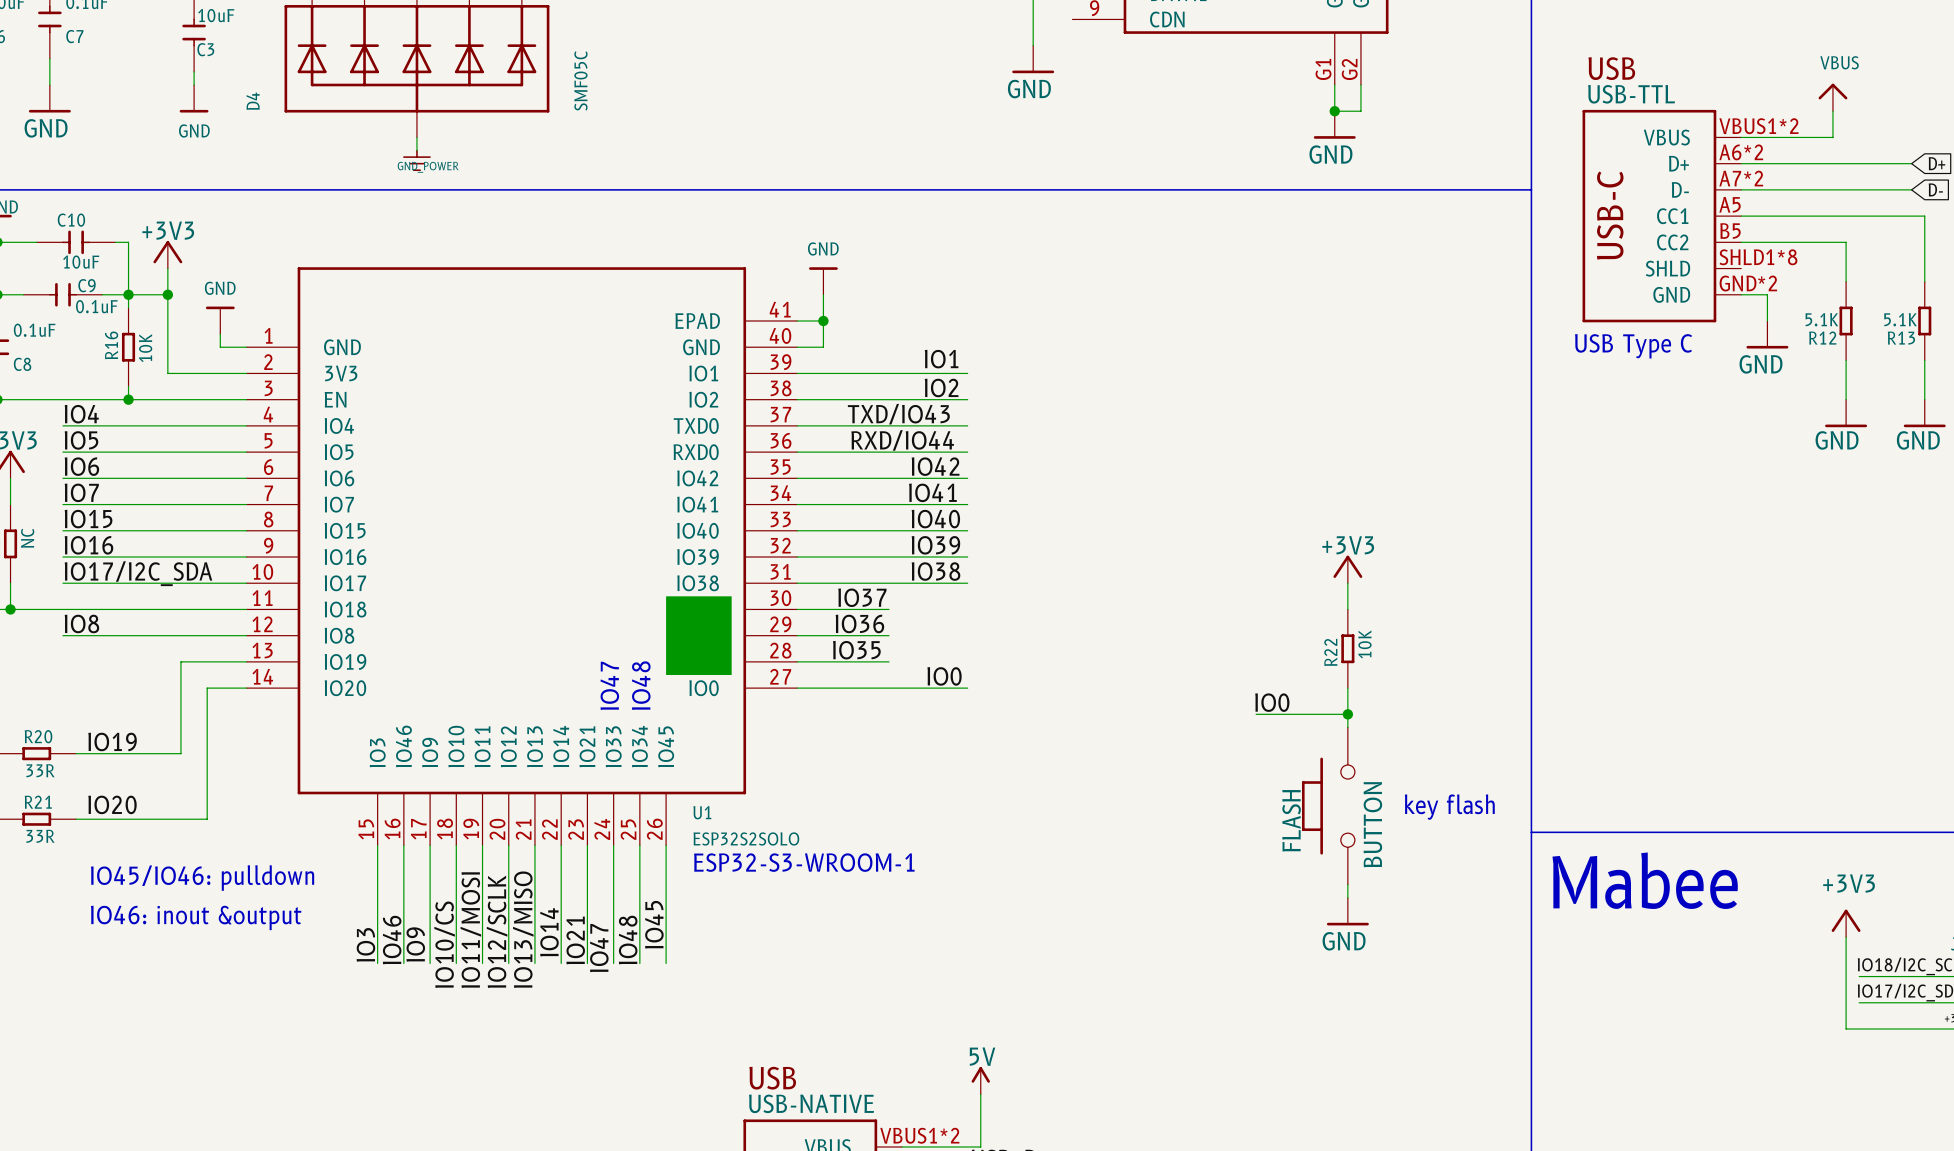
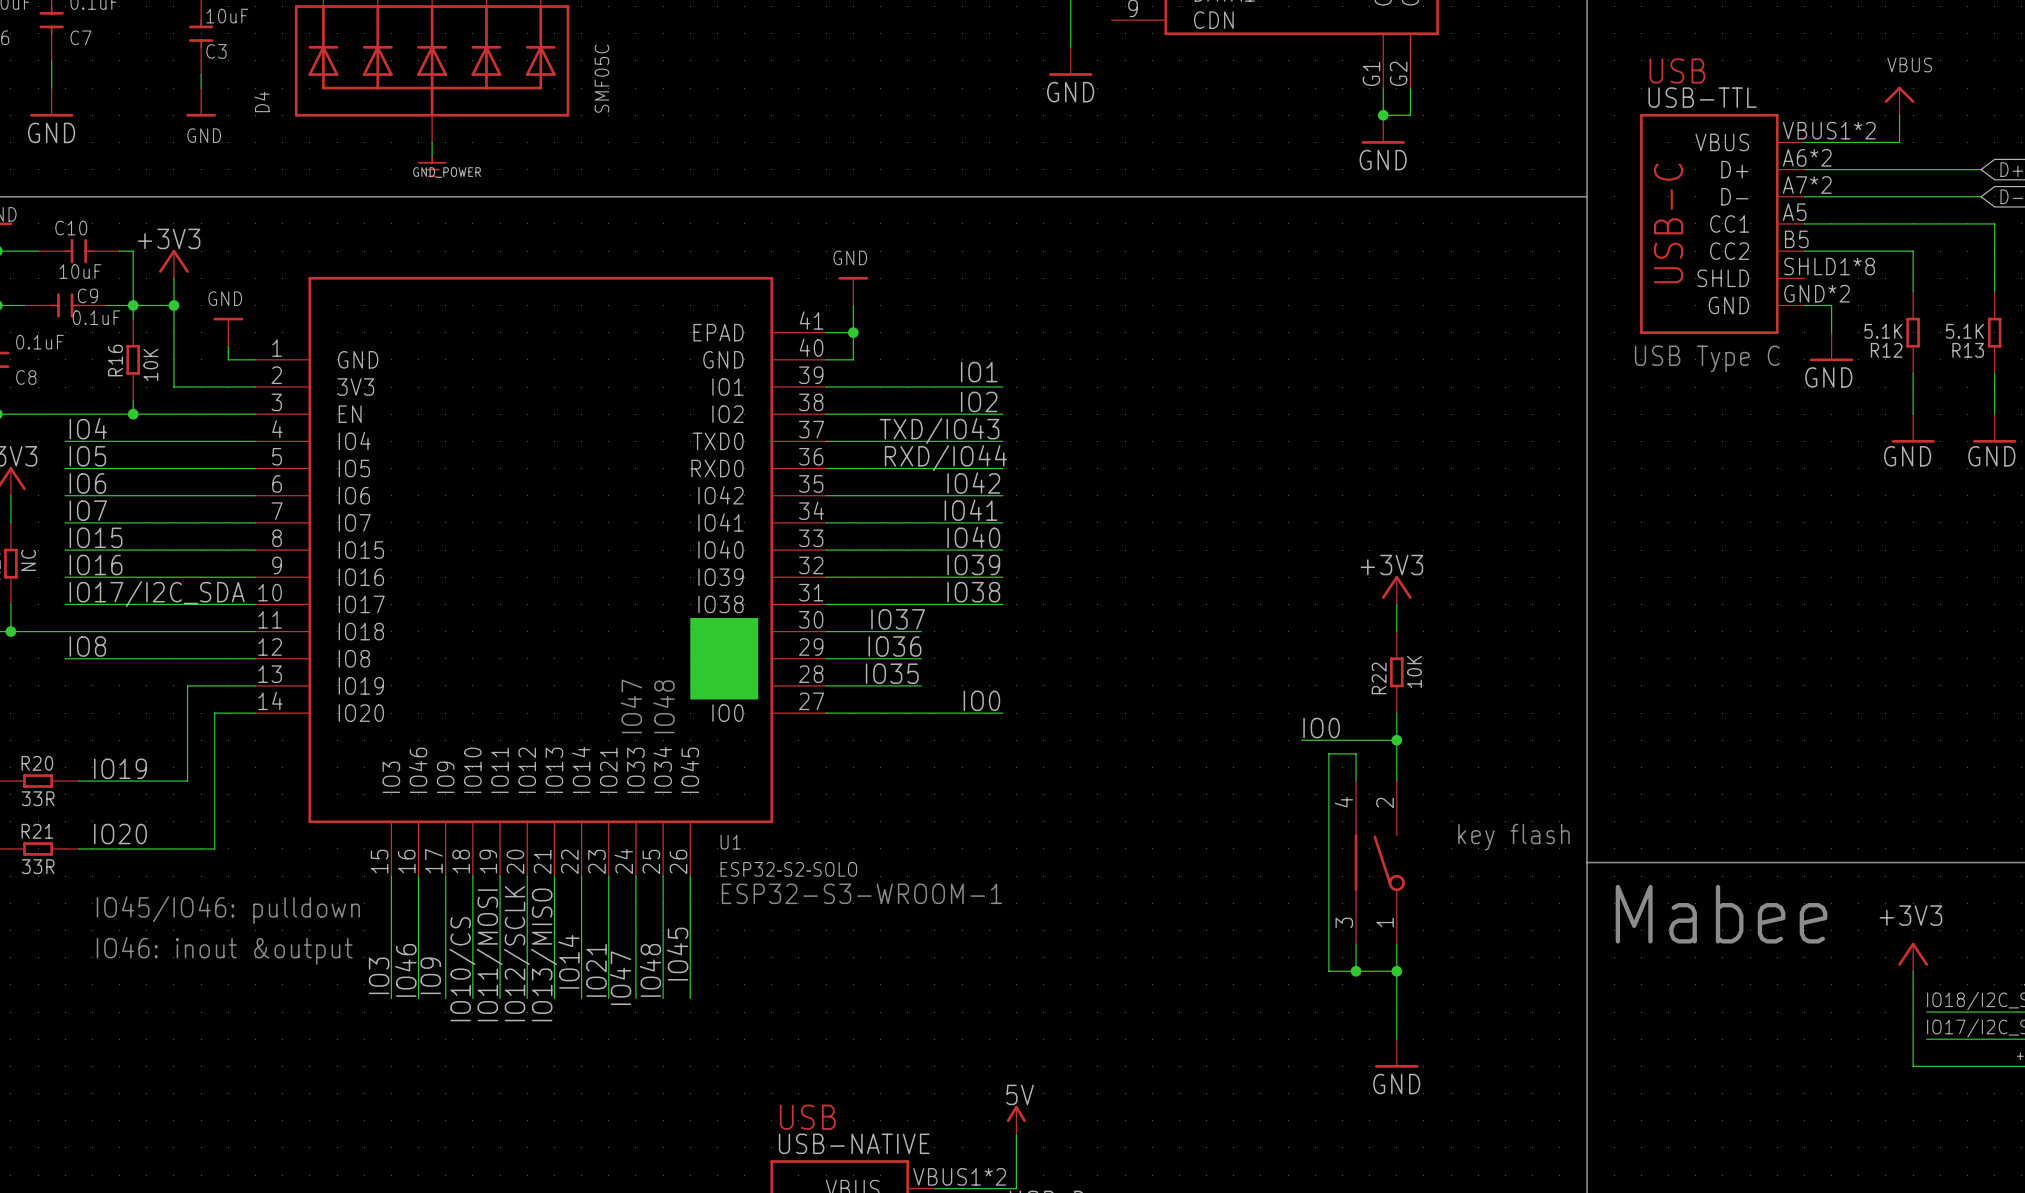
wire: none -> (1356, 781) (1356, 753) (1328, 753) (1328, 971) (1396, 971)
FLASH: BUTTON (1328, 806) -> none
part: none -> (1379, 862)
wire: none -> (1356, 944) (1356, 971)
wire: none -> (1396, 944) (1396, 1039)
power symbol position: GND (1347, 911) -> GND (1396, 1053)
junction: none -> (1356, 971)
junction: none -> (1396, 971)

